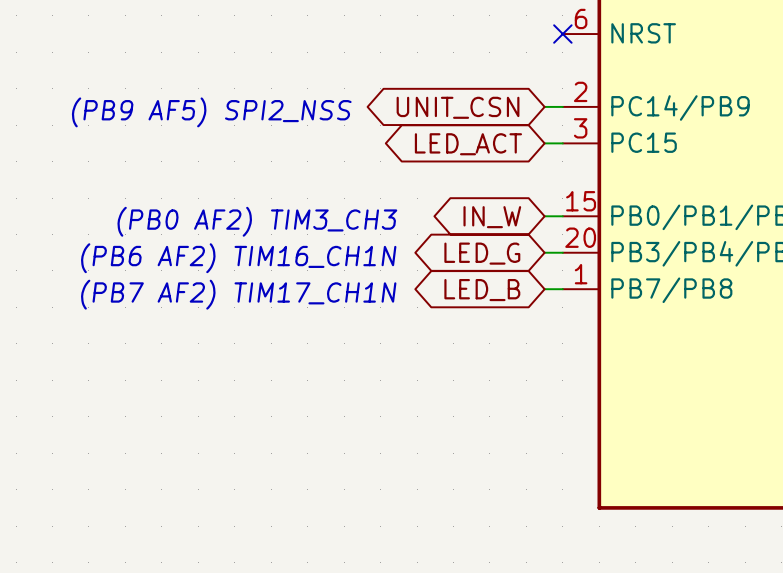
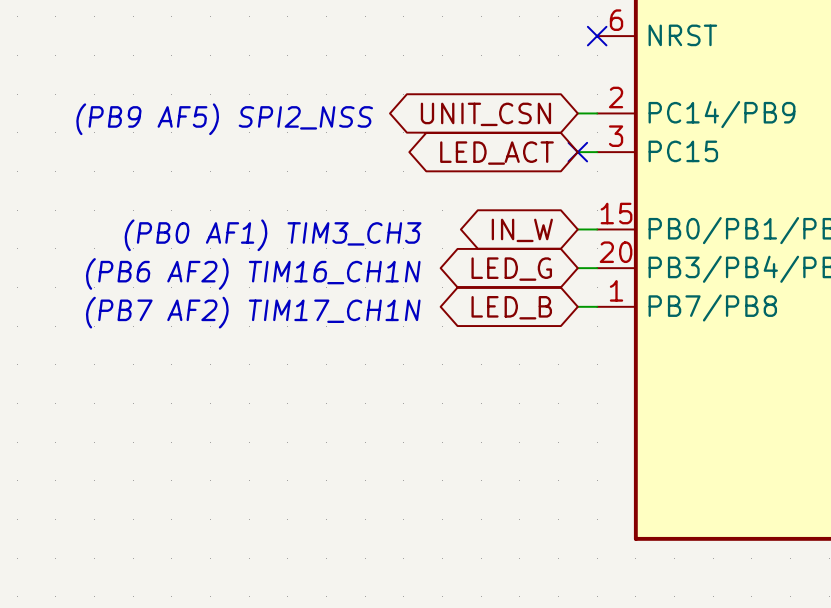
no-connect mark: none -> (577, 152)
text: (PB0 AF2) TIM3_CH3 (257, 221) -> (PB0 AF1) TIM3_CH3 (273, 235)

